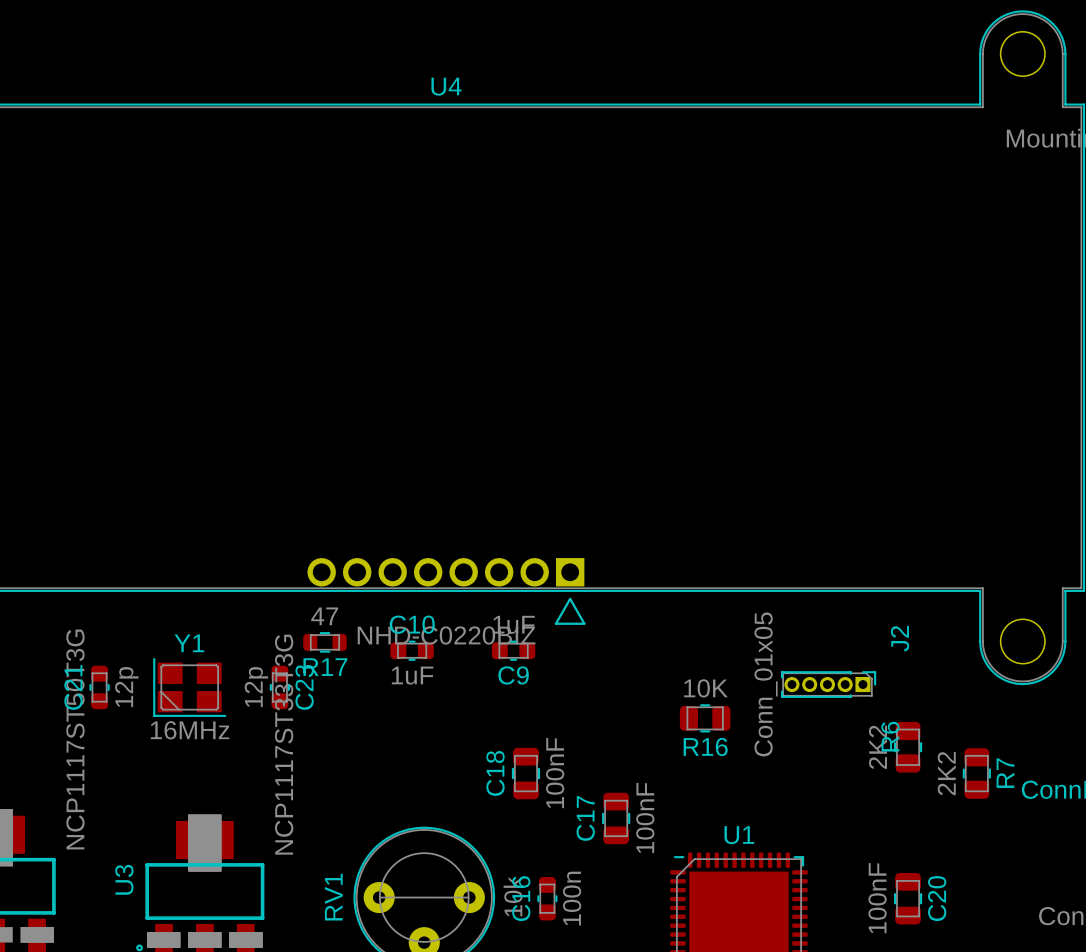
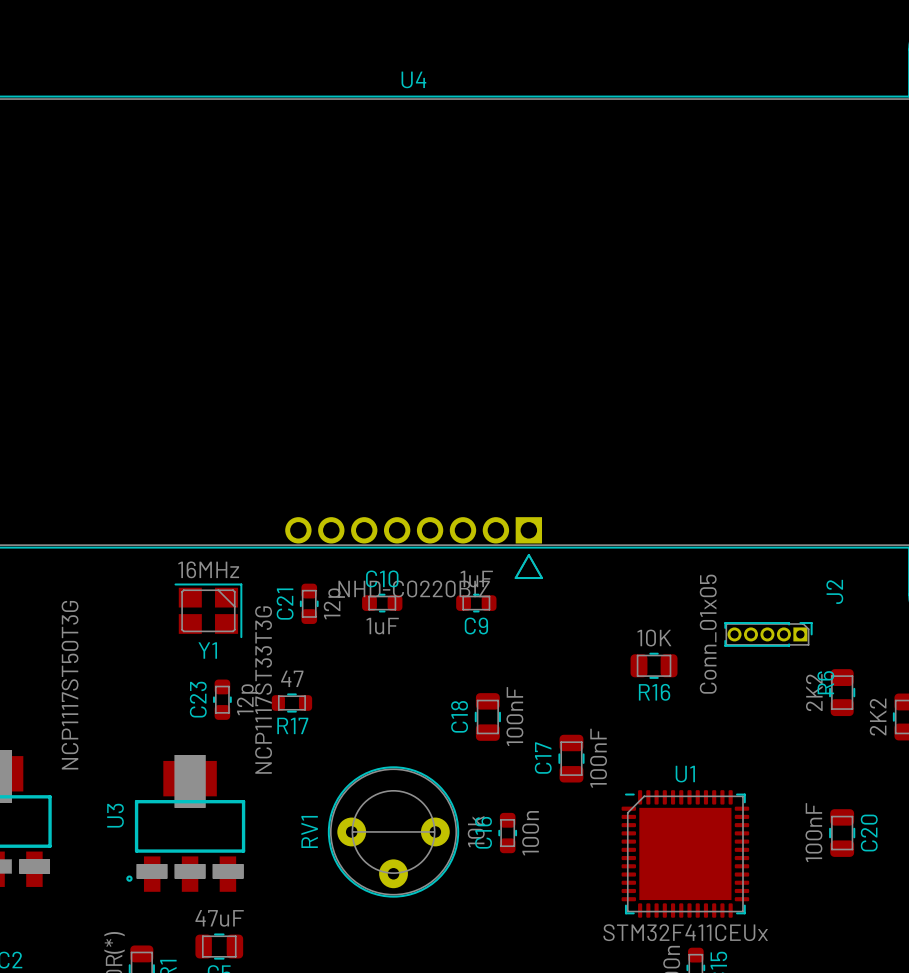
R17 position: (324, 642) -> (291, 703)
C21 position: (99, 687) -> (309, 603)
Y1 rotation: 0° (189, 687) -> 180° (208, 610)
Y1 position: (189, 687) -> (208, 610)
C23 value position: 12p (256, 687) -> 12p (247, 699)
C23 position: (279, 687) -> (222, 699)
C23 name position: C23 (304, 687) -> C23 (198, 699)

